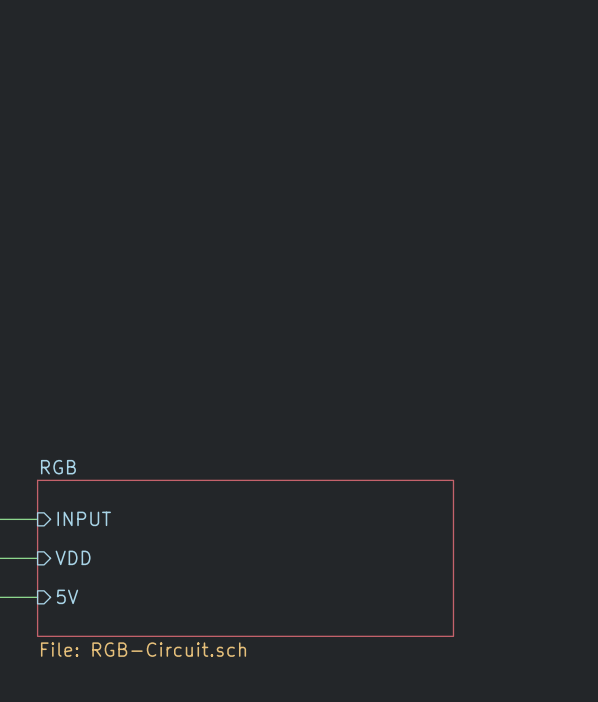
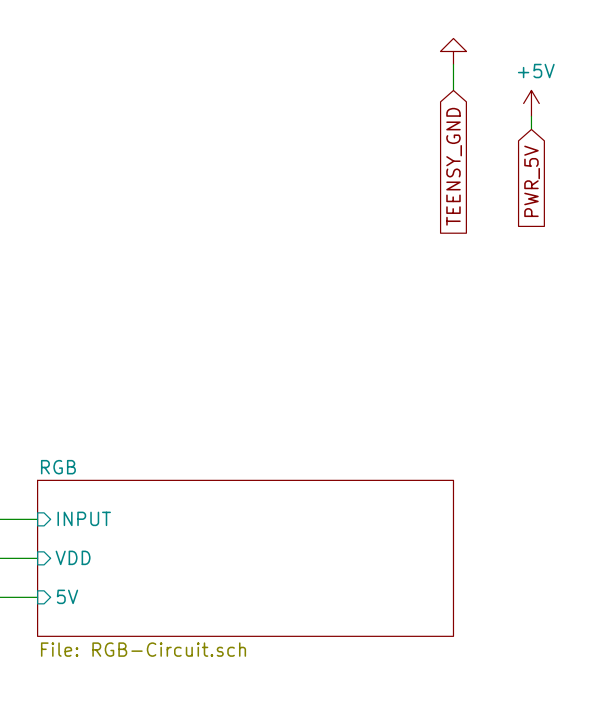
power symbol: none -> (453, 51)
wire: none -> (453, 64) (453, 90)
power symbol: none -> +5V (531, 103)
wire: none -> (531, 116) (531, 129)
global label: none -> TEENSY_GND (454, 166)
global label: none -> PWR_5V (532, 181)

